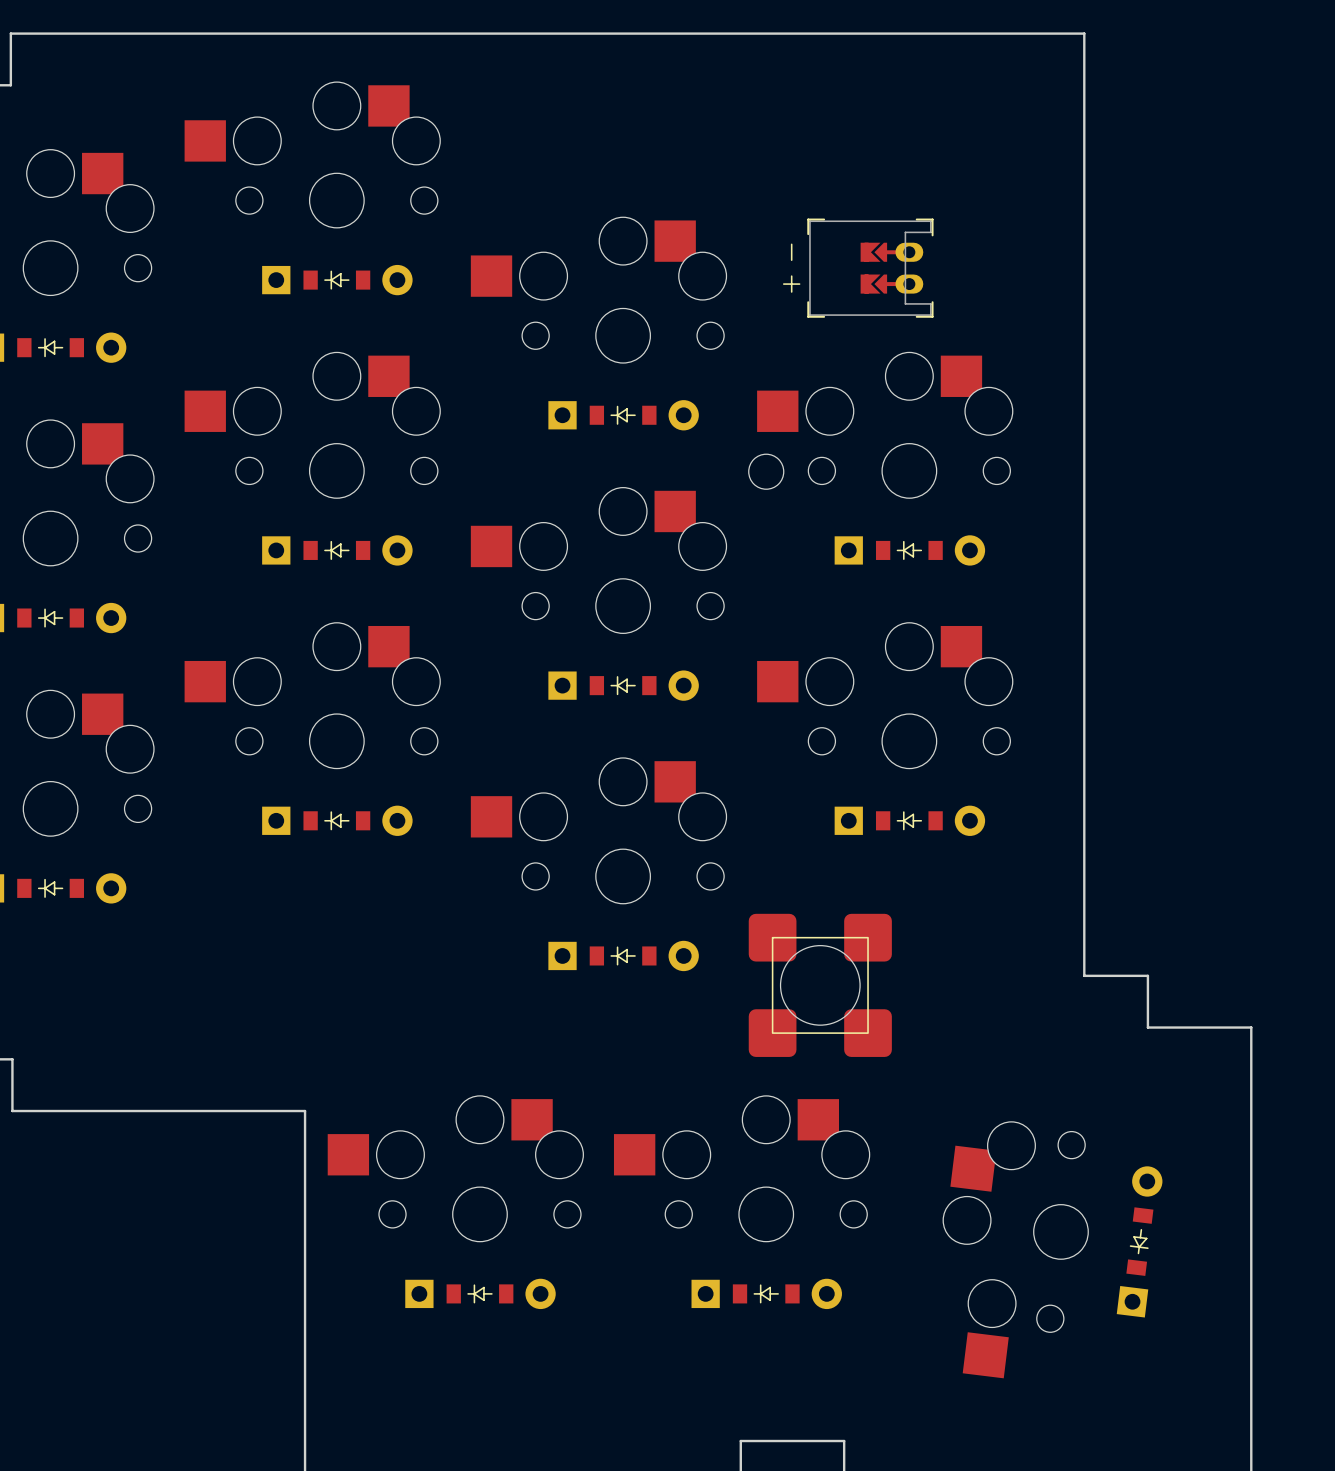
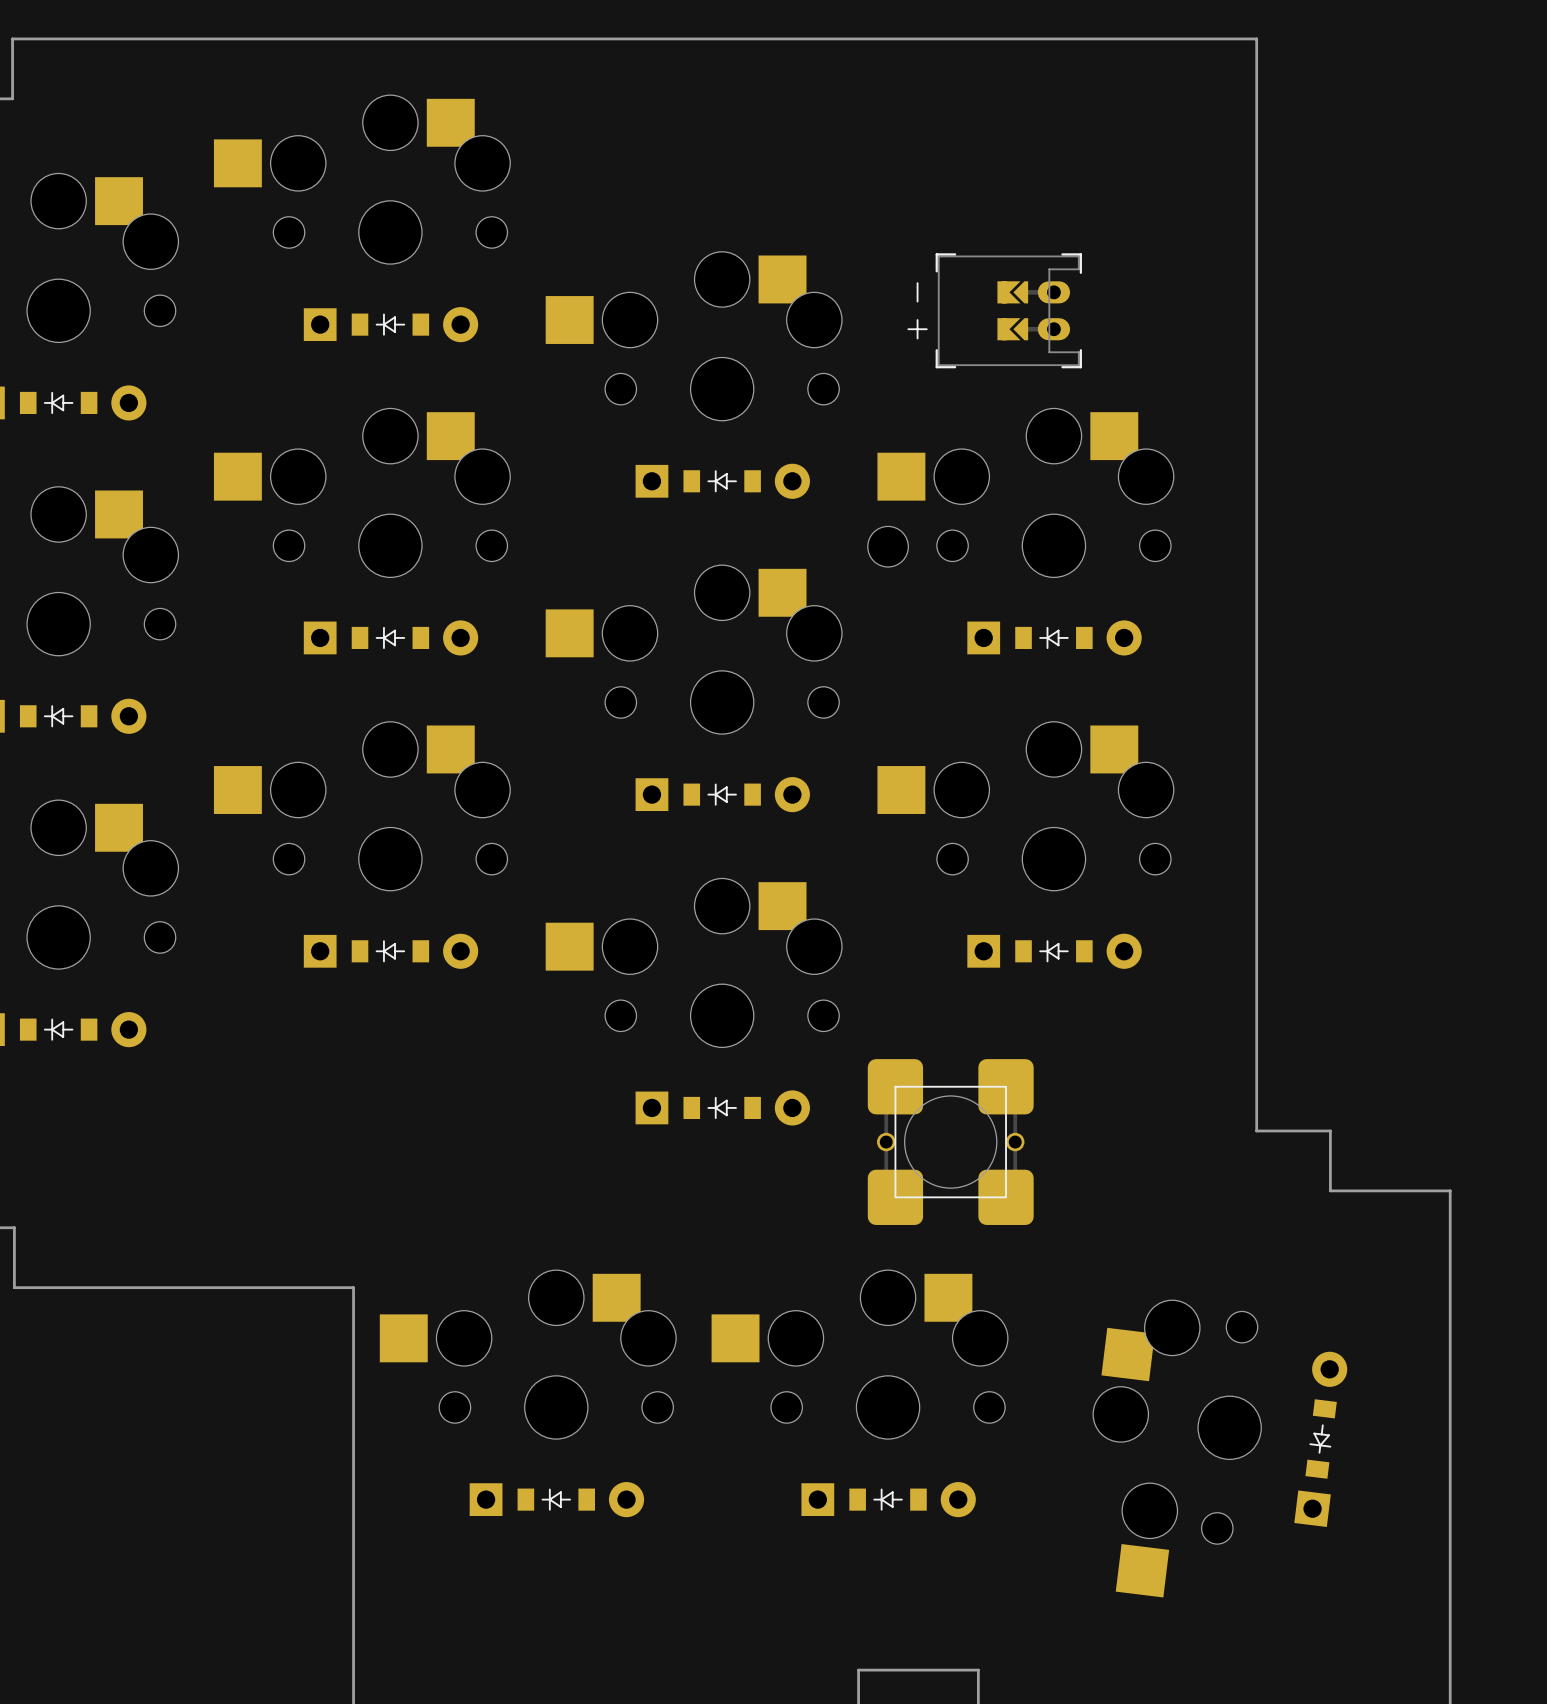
part footprint: [748, 913, 892, 1057] -> [867, 1059, 1034, 1225]

